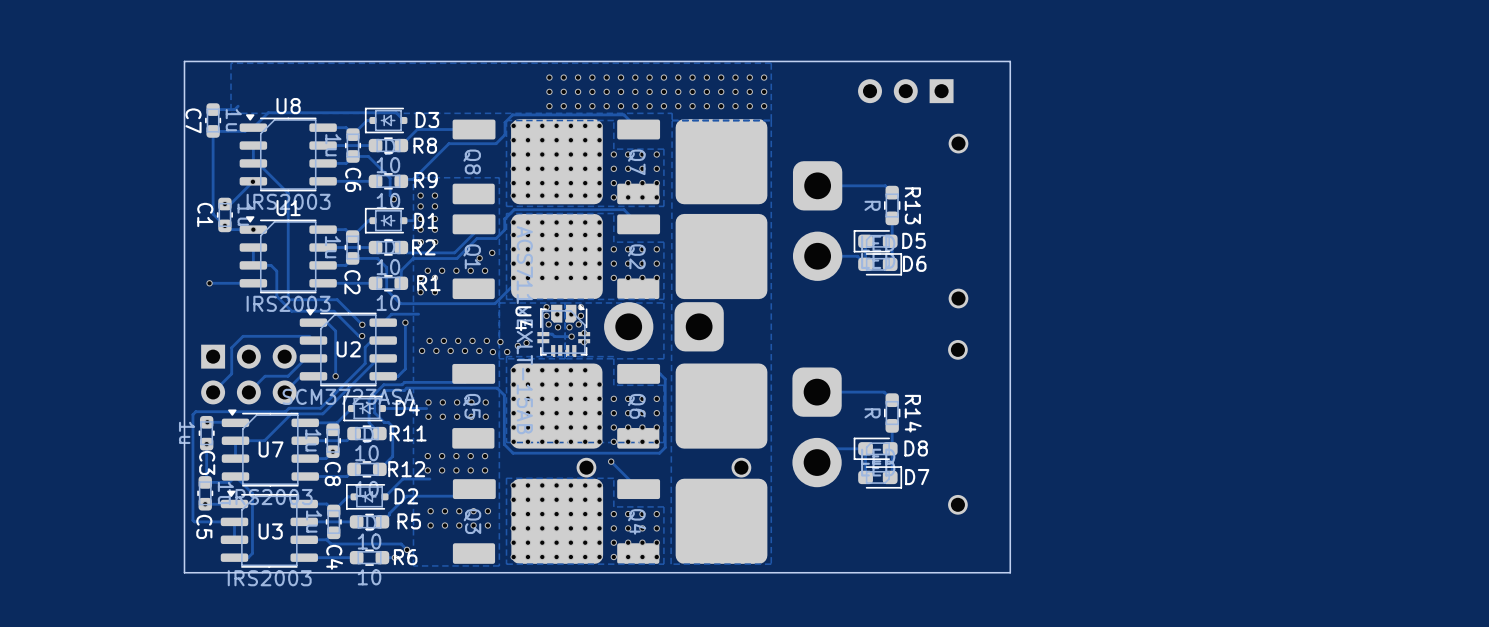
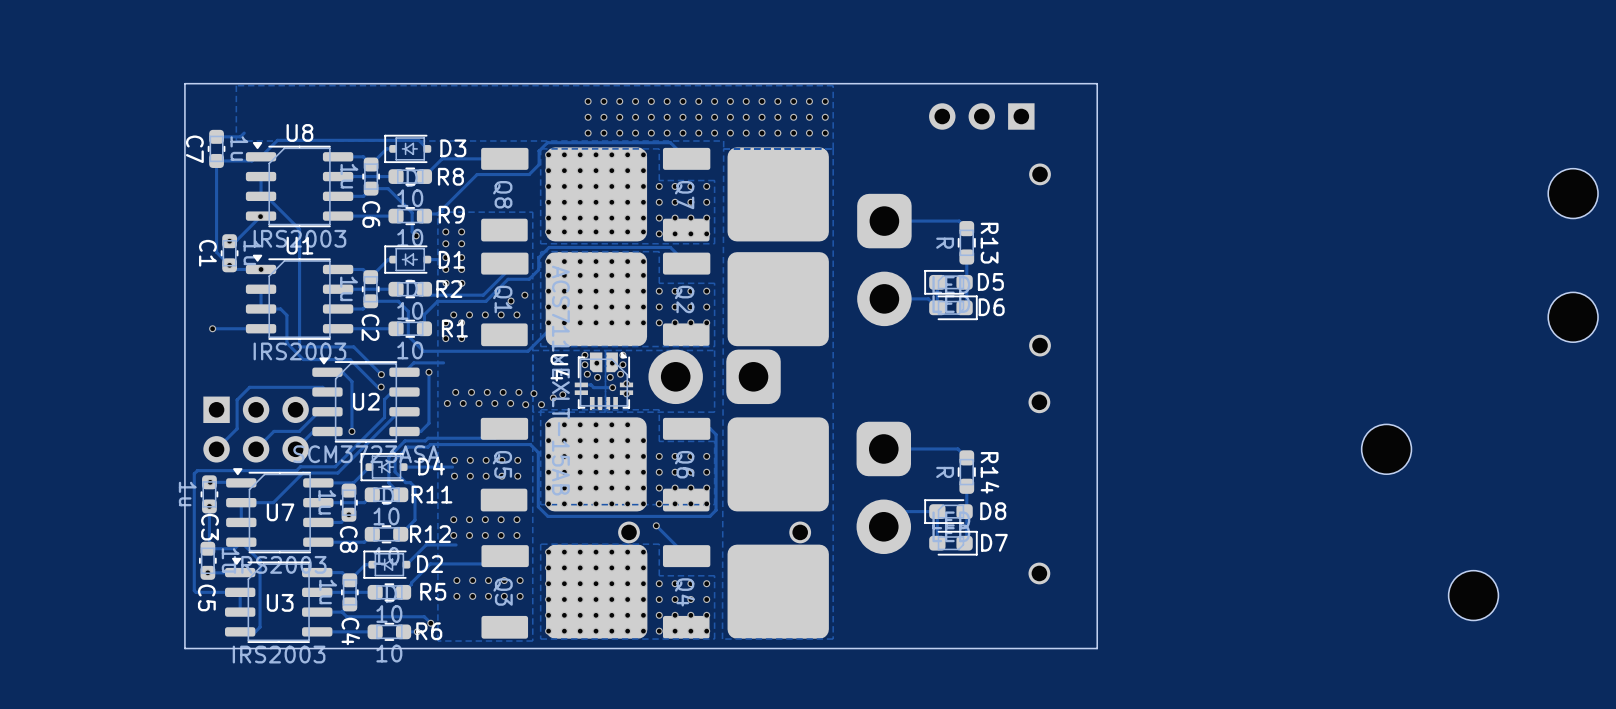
part: none -> (1573, 193)
part: none -> (1573, 317)
part: none -> (1386, 449)
part: none -> (1473, 595)

